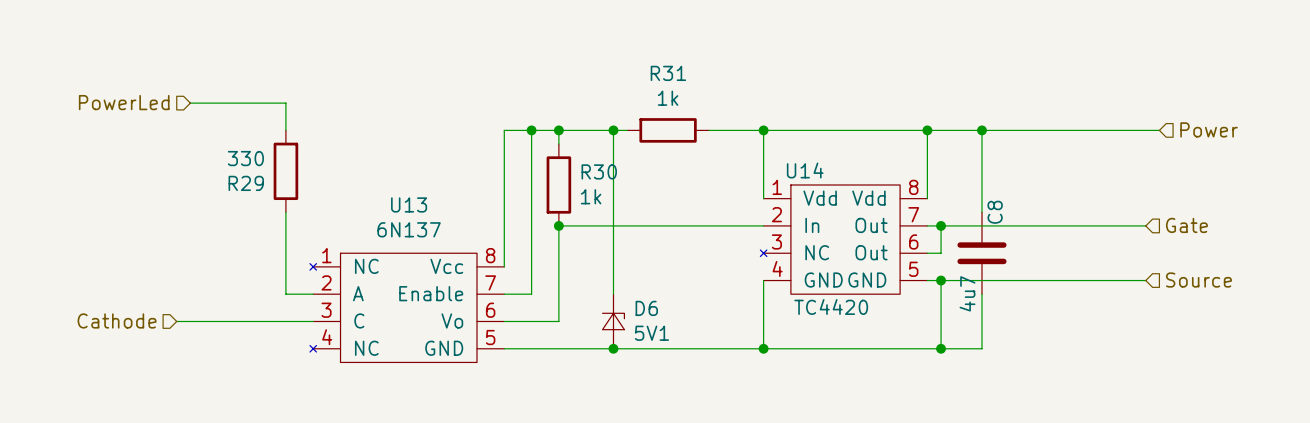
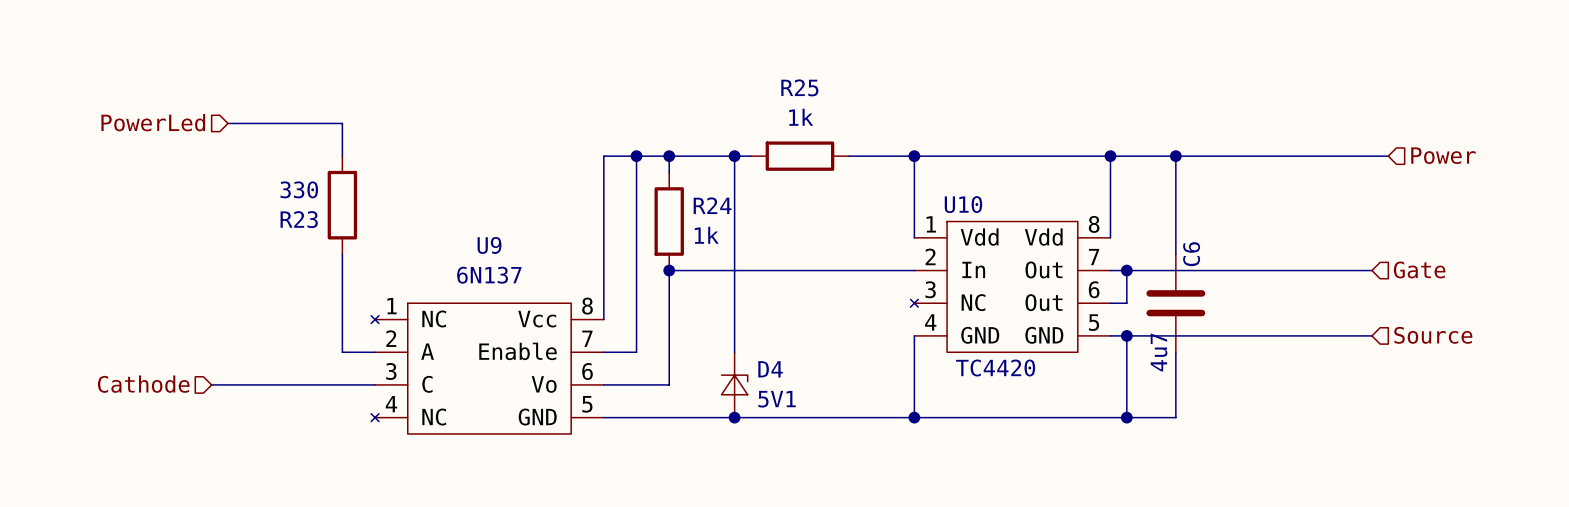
R31 name: R31 (668, 73) -> R25 (799, 87)
U14 name: U14 (805, 170) -> U10 (963, 204)
R30 name: R30 (599, 171) -> R24 (712, 205)
R29 name: R29 (246, 183) -> R23 (299, 219)
U13 name: U13 (409, 204) -> U9 (489, 245)
C8 name: C8 (995, 212) -> C6 (1191, 254)
D6 name: D6 (646, 308) -> D4 (770, 369)

